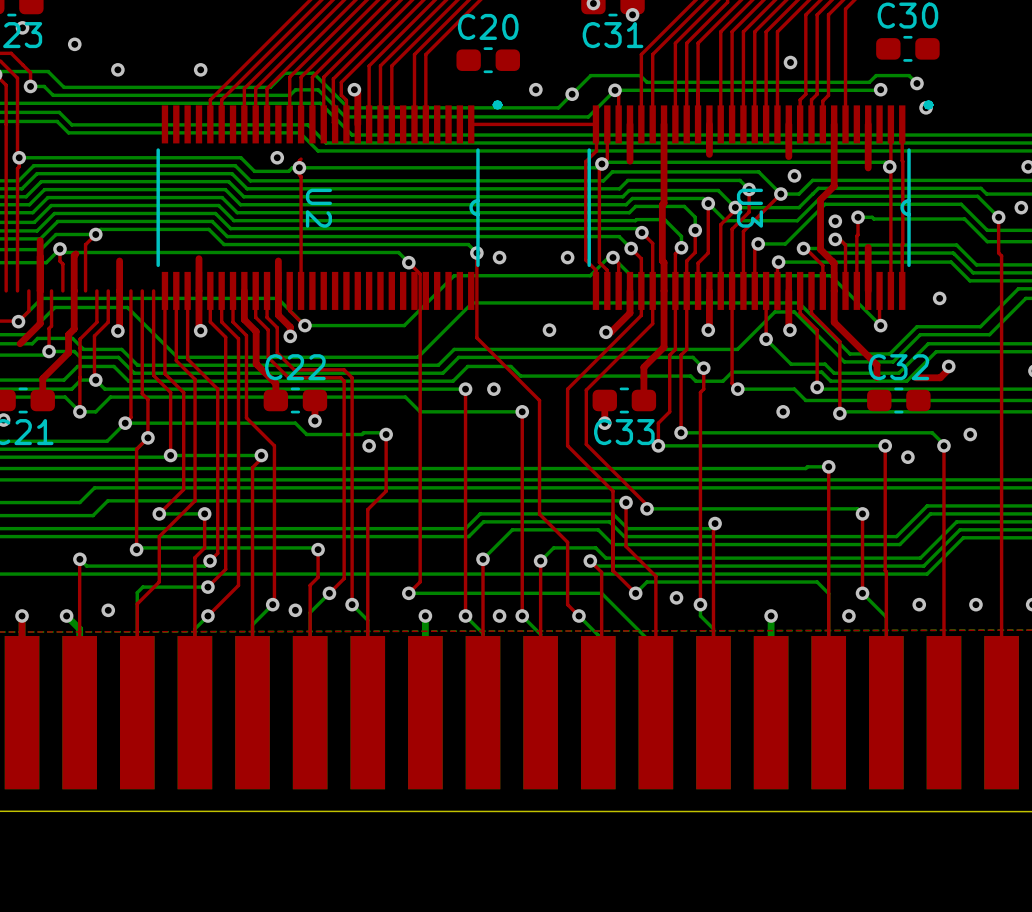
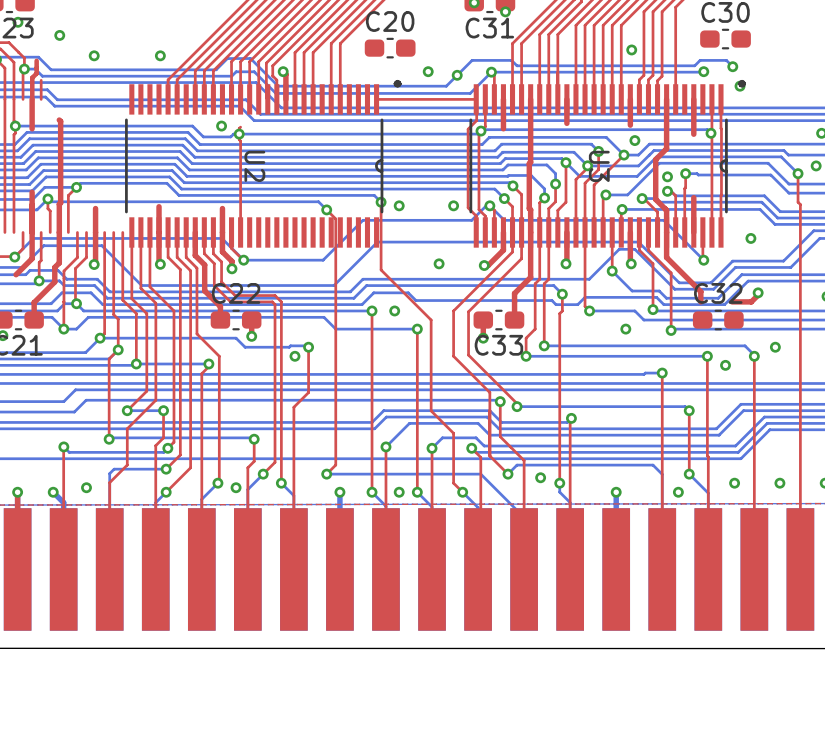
top track: none -> (36, 60) (36, 73) (32, 77) (32, 99)
top track: none -> (23, 71) (23, 99)
top track: none -> (41, 80) (41, 99)
top track: none -> (32, 99) (32, 128)
top track: none -> (59, 120) (60, 202)

